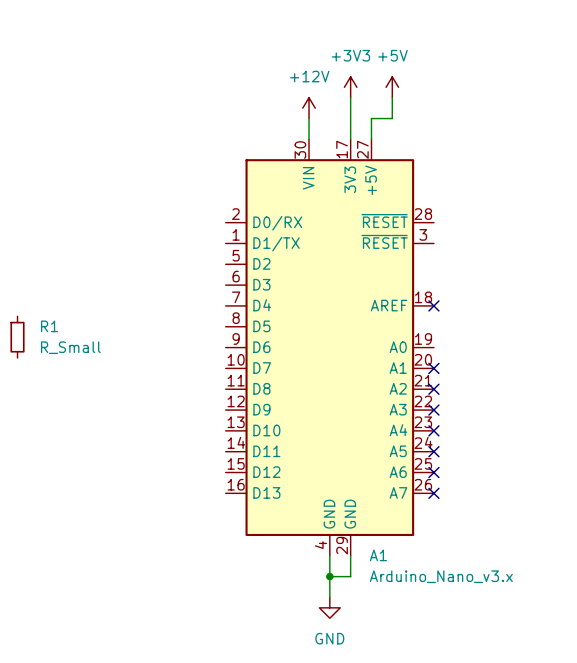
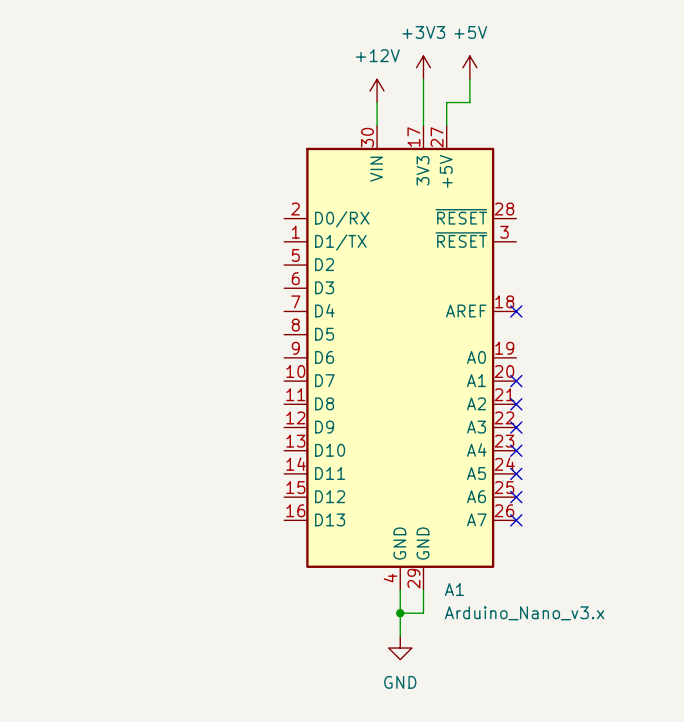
R1: R_Small (17, 337) -> none

